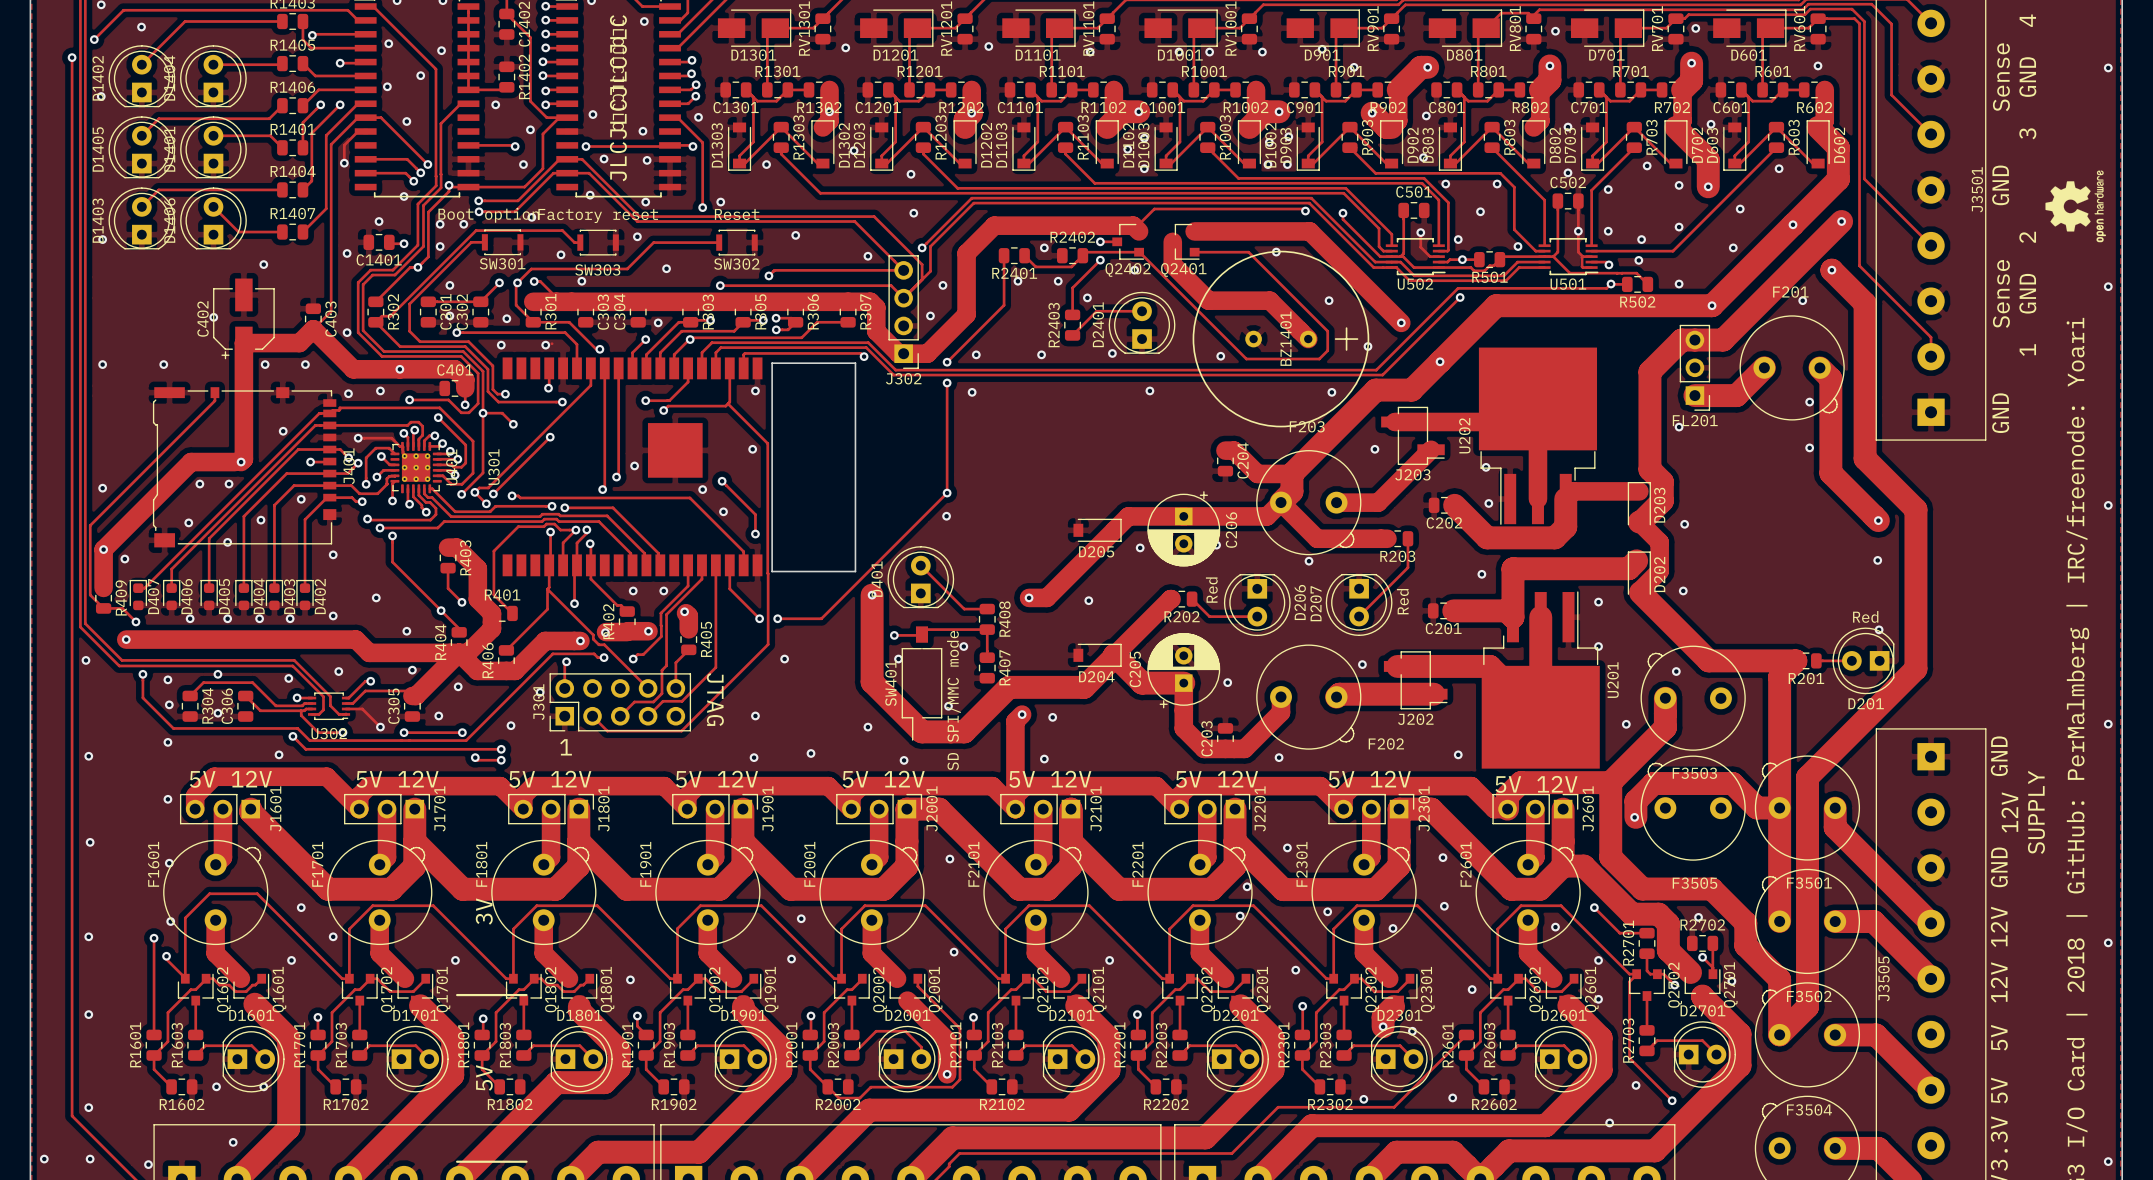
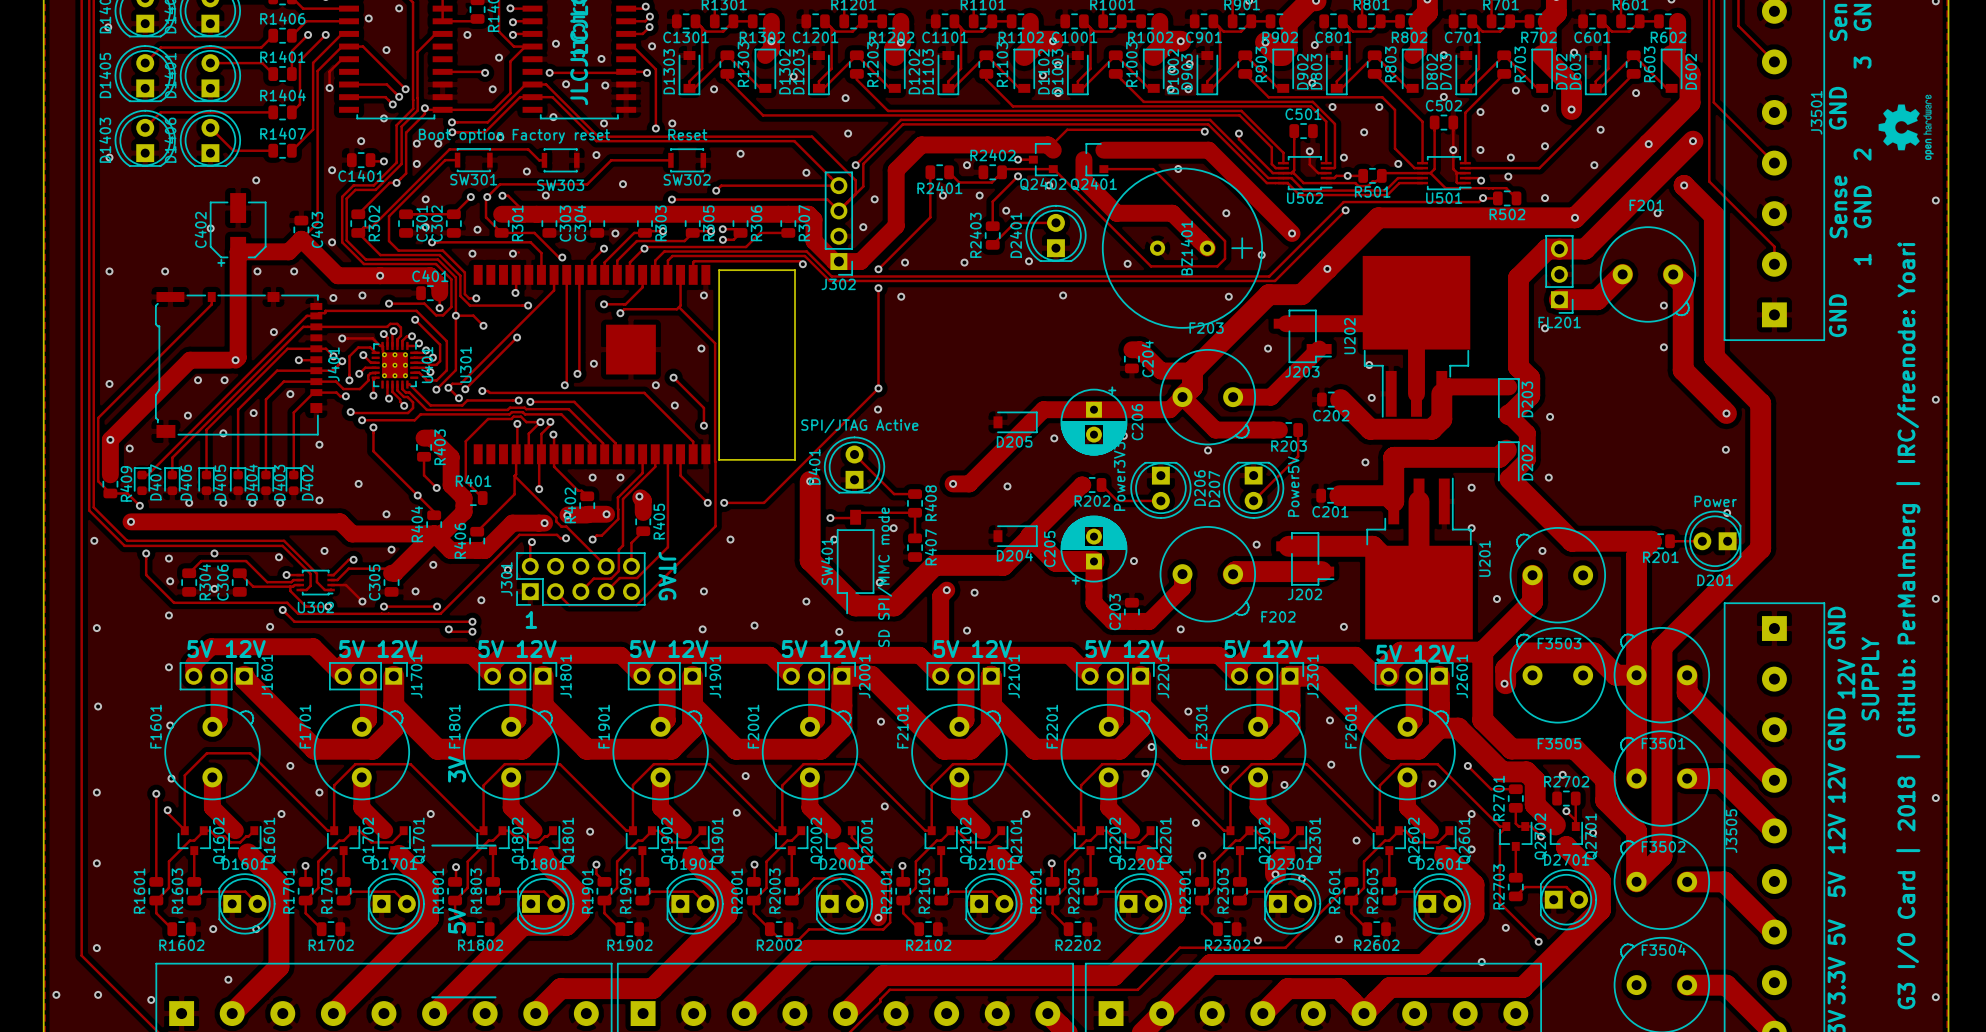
D401 value: none -> SPI/JTAG Active (859, 426)
D206 value: Red (1211, 590) -> Power3V3 (1119, 476)
D207 value: Red (1402, 601) -> Power5V (1293, 486)
D201 value: Red (1865, 616) -> Power (1715, 501)

